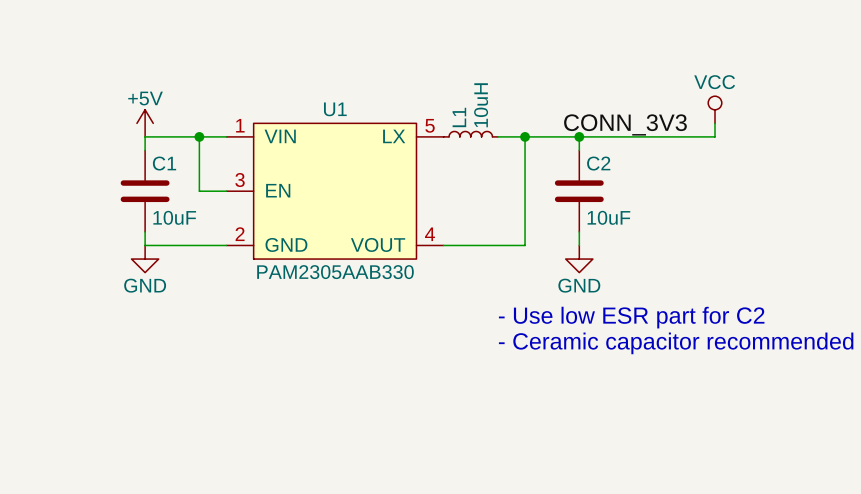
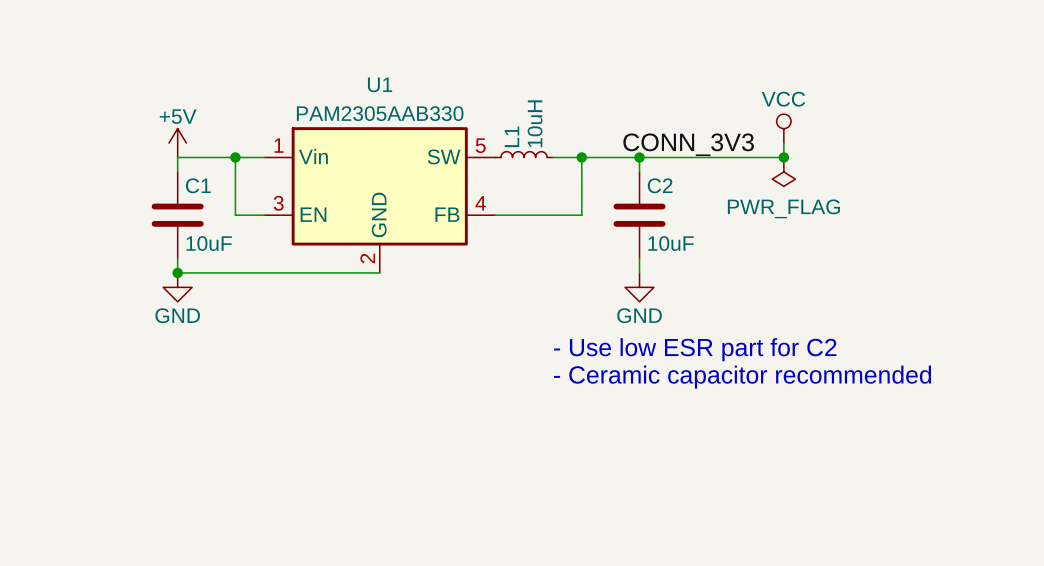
U1 name position: U1 (335, 109) -> U1 (380, 84)
U1 symbol: [226, 123, 444, 260] -> [264, 127, 496, 273]
junction: none -> (783, 157)
power symbol: none -> PWR_FLAG (783, 171)
wire: (525, 191) (525, 245) (443, 245) -> (581, 215) (495, 215)
junction: none -> (177, 272)
U1 value position: PAM2305AAB330 (335, 272) -> PAM2305AAB330 (380, 113)

